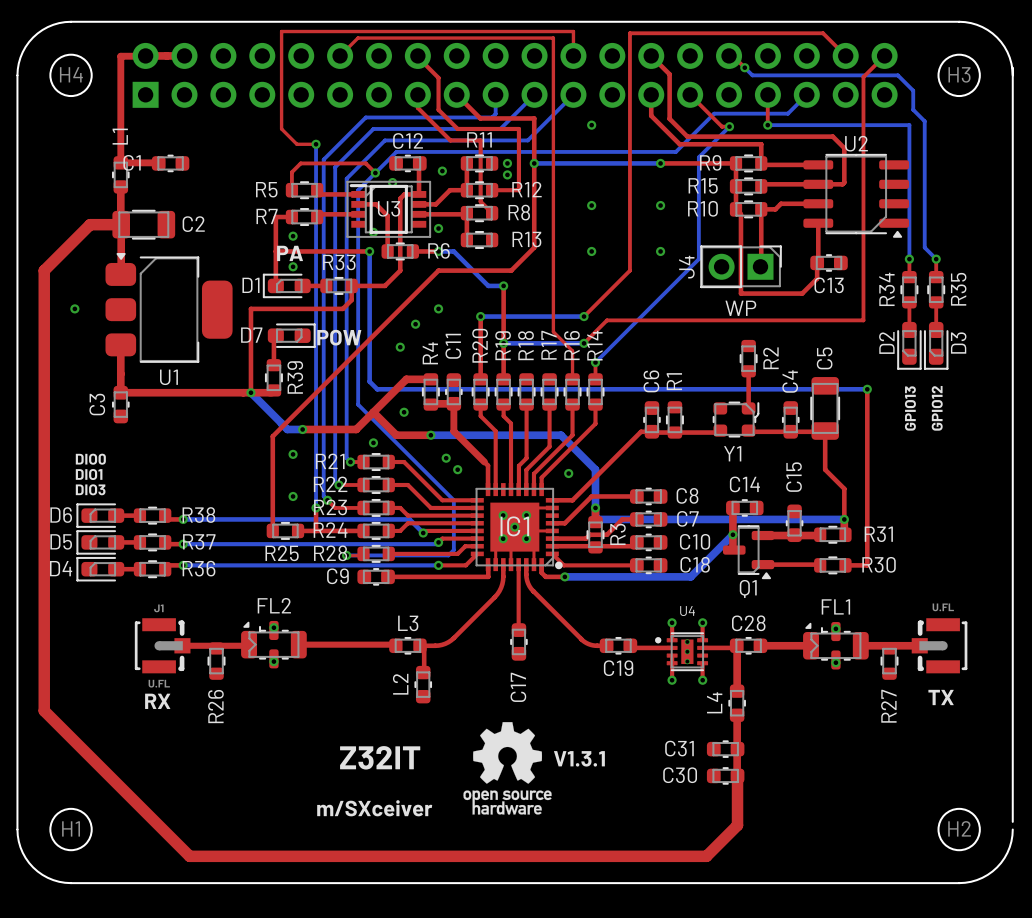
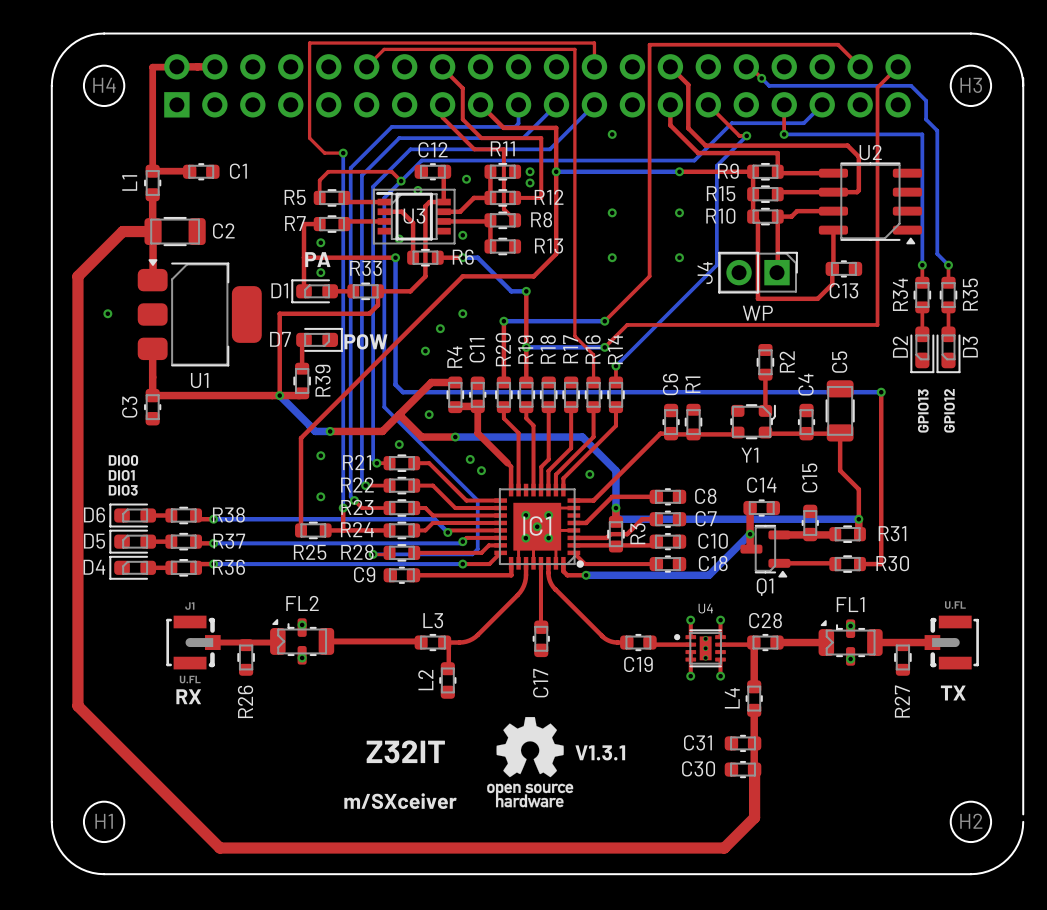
L1 name position: L1 (120, 136) -> L1 (129, 182)
C1 name position: C1 (132, 162) -> C1 (238, 171)

